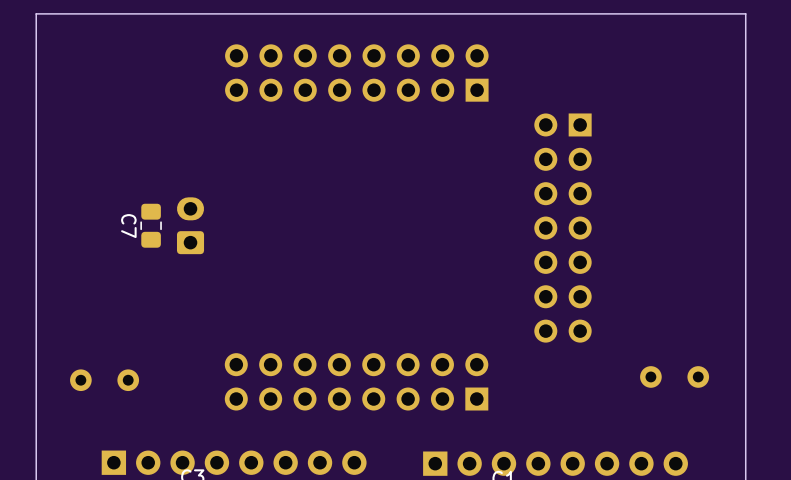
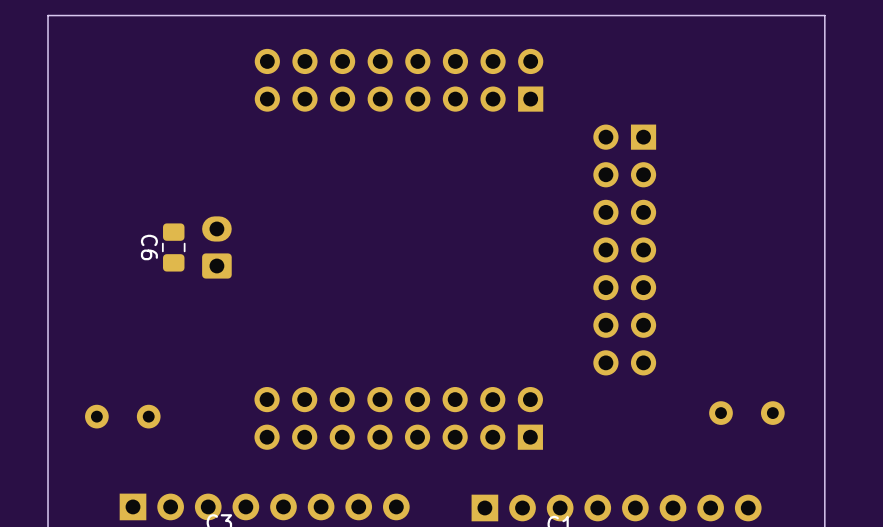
C7 name: C7 (128, 226) -> C6 (149, 247)

